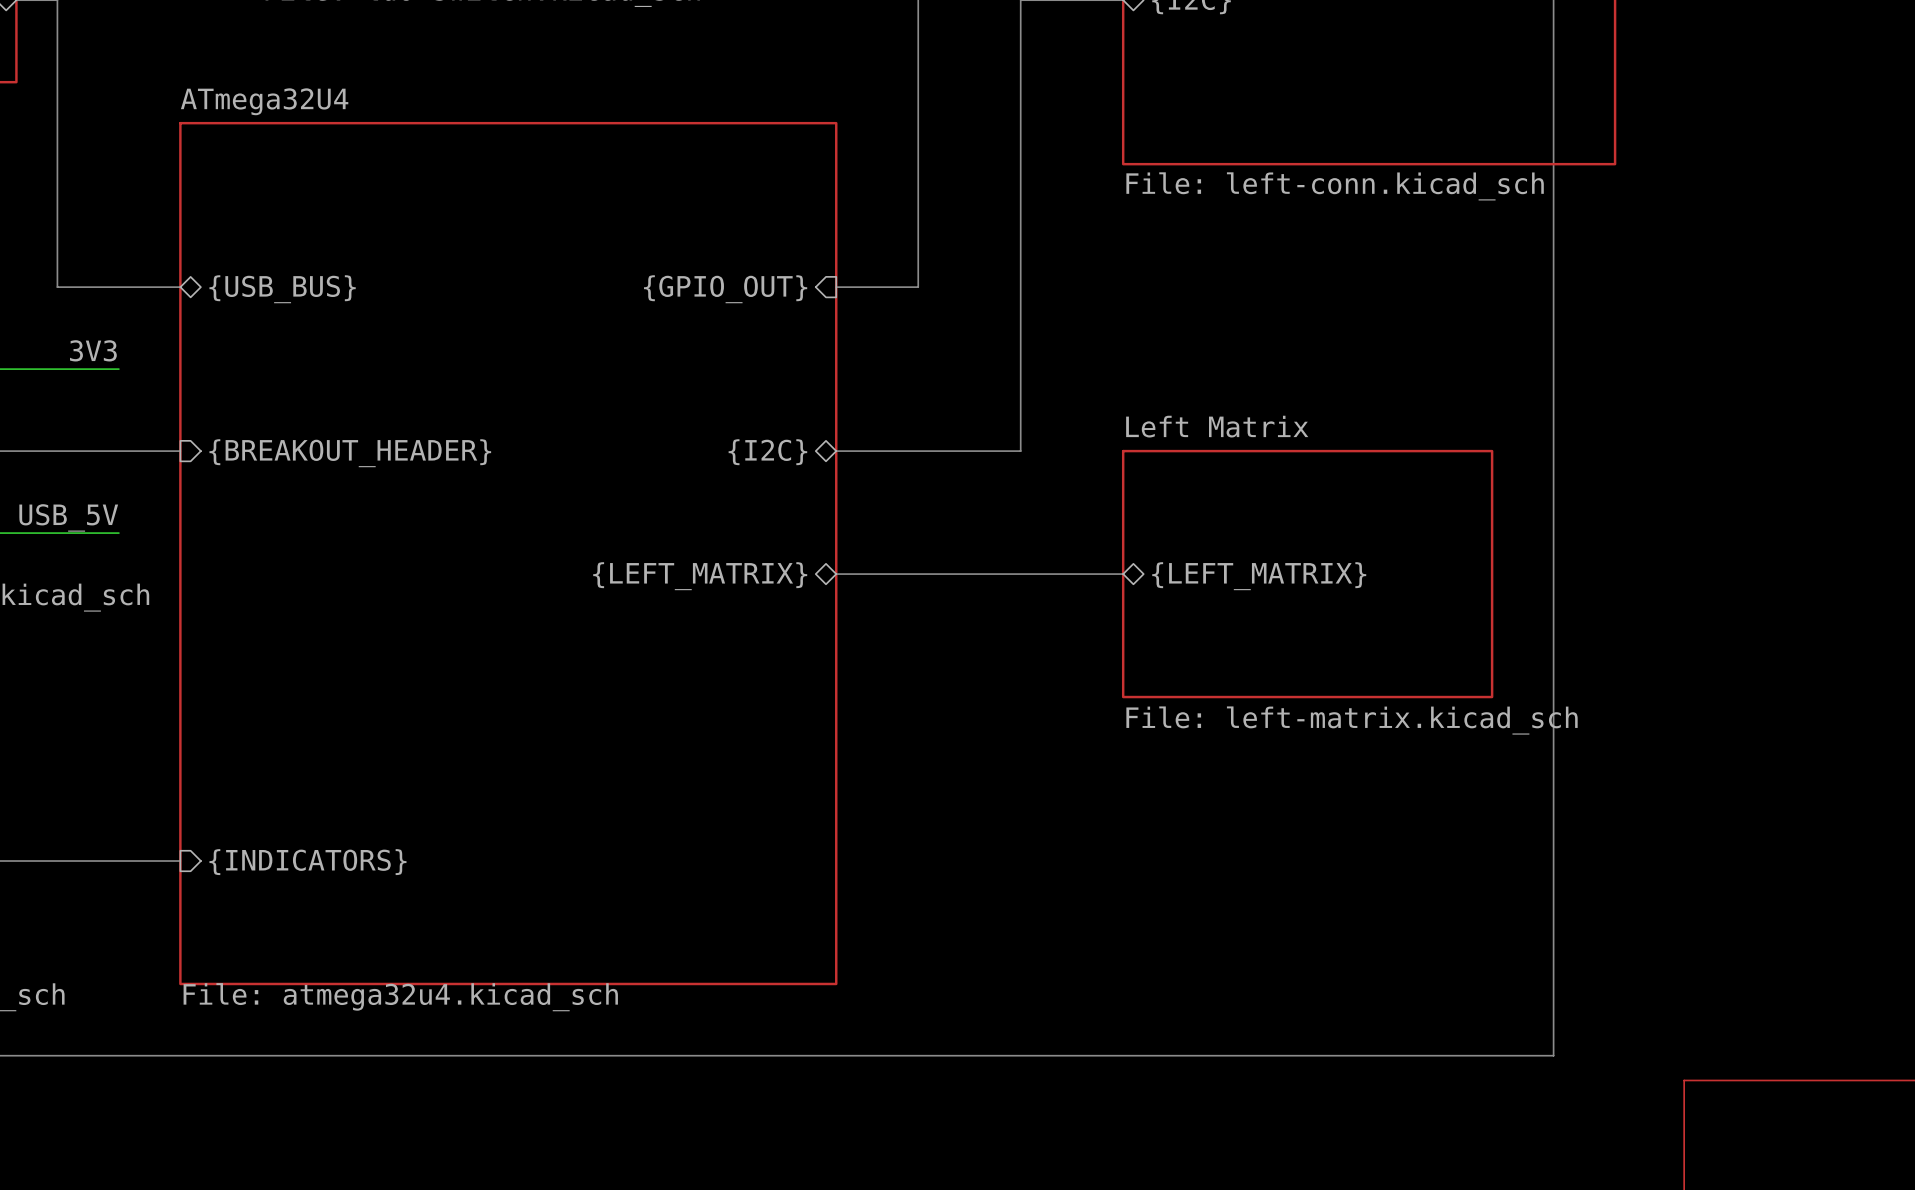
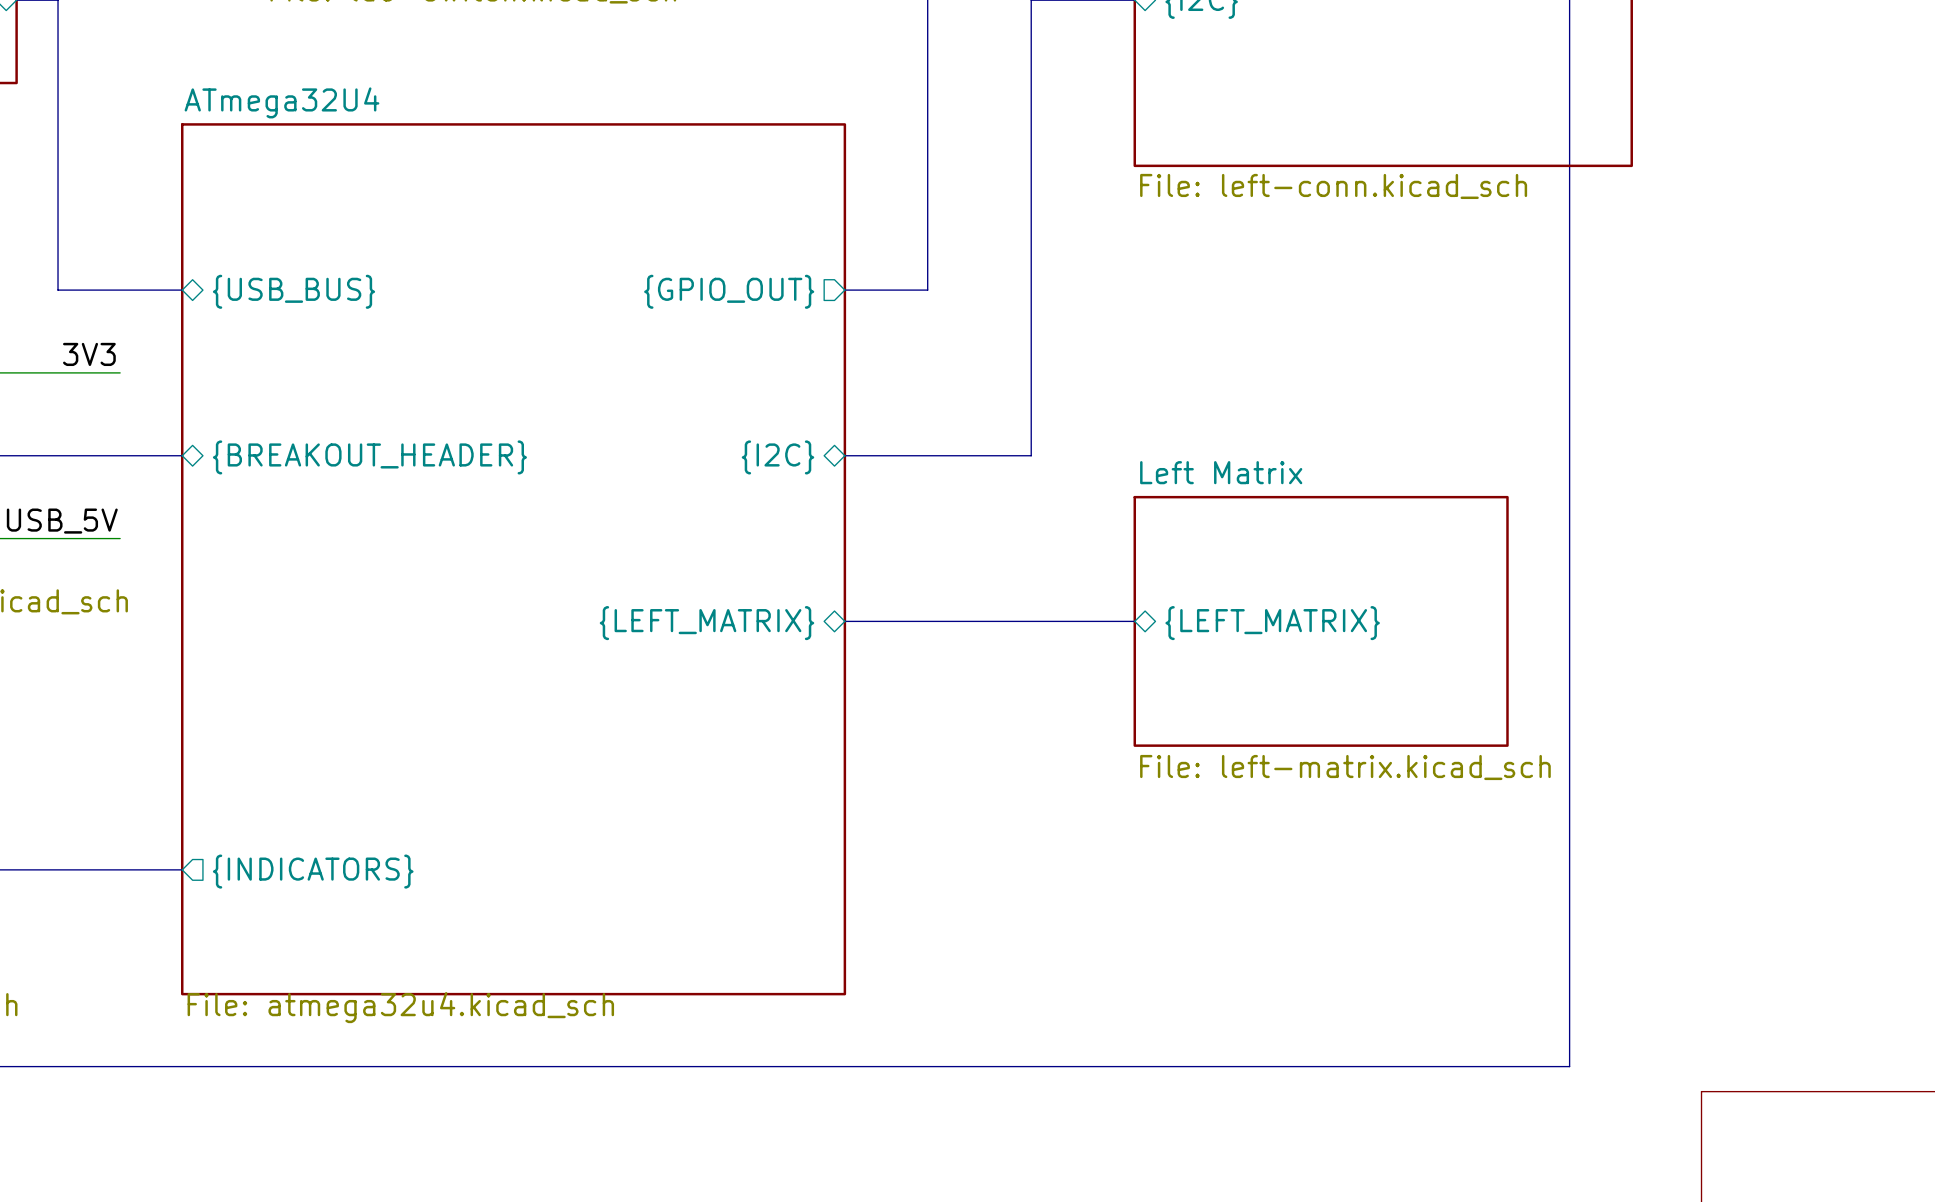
sheet pin shape: input (725, 289) -> output (729, 291)
sheet pin shape: input (350, 453) -> bidirectional (369, 457)
bus: (836, 574) (1123, 574) -> (844, 621) (1134, 621)
sheet Left Matrix position: (1307, 574) -> (1321, 621)
sheet pin position: {LEFT_MATRIX} (700, 576) -> {LEFT_MATRIX} (706, 623)
sheet pin position: {LEFT_MATRIX} (1259, 576) -> {LEFT_MATRIX} (1272, 623)
sheet pin shape: input (307, 862) -> output (313, 871)

